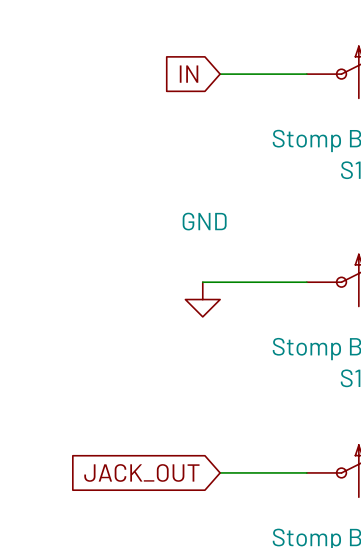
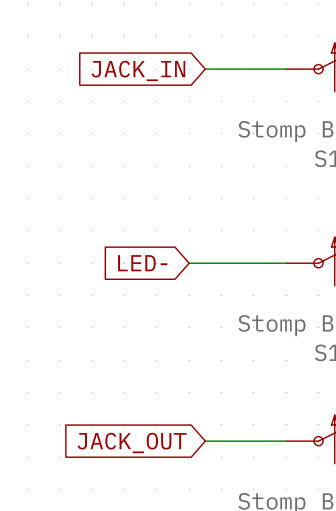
global label: IN (189, 74) -> JACK_IN (138, 70)
global label: none -> LED- (142, 263)
power symbol: GND (202, 299) -> none

